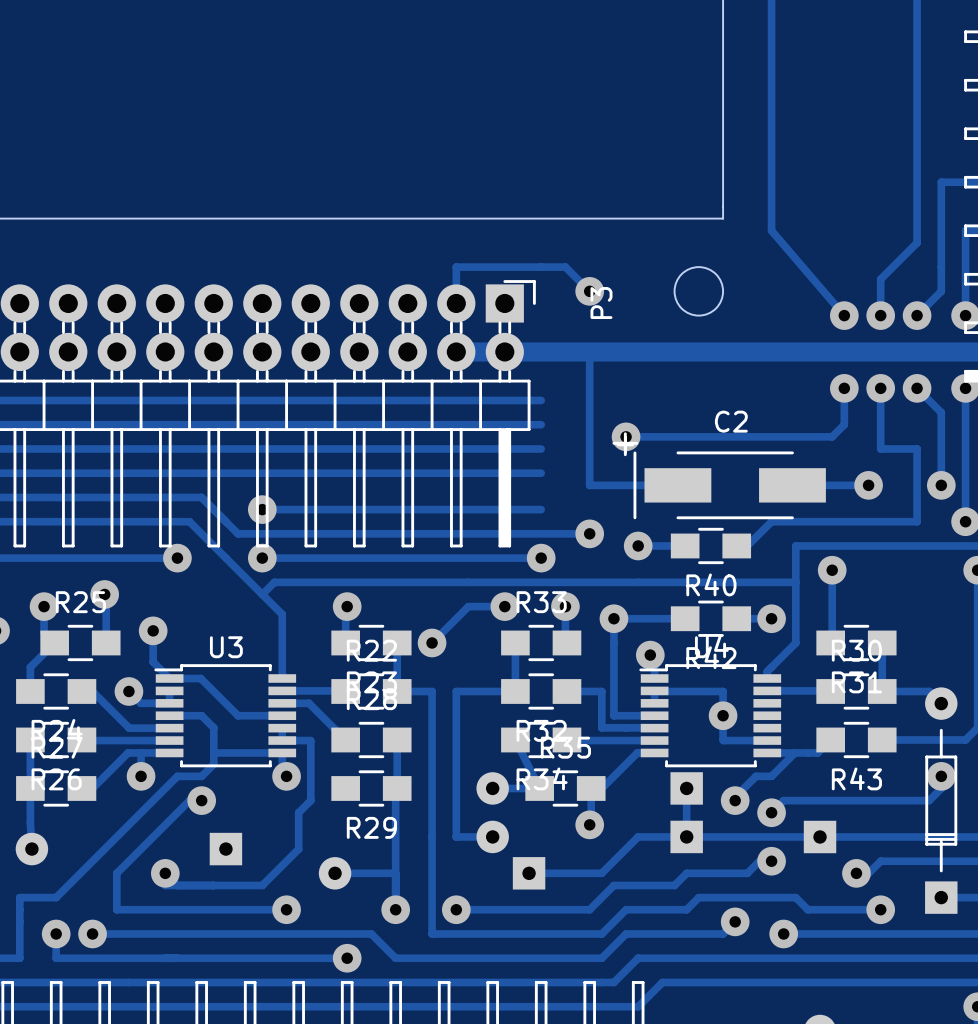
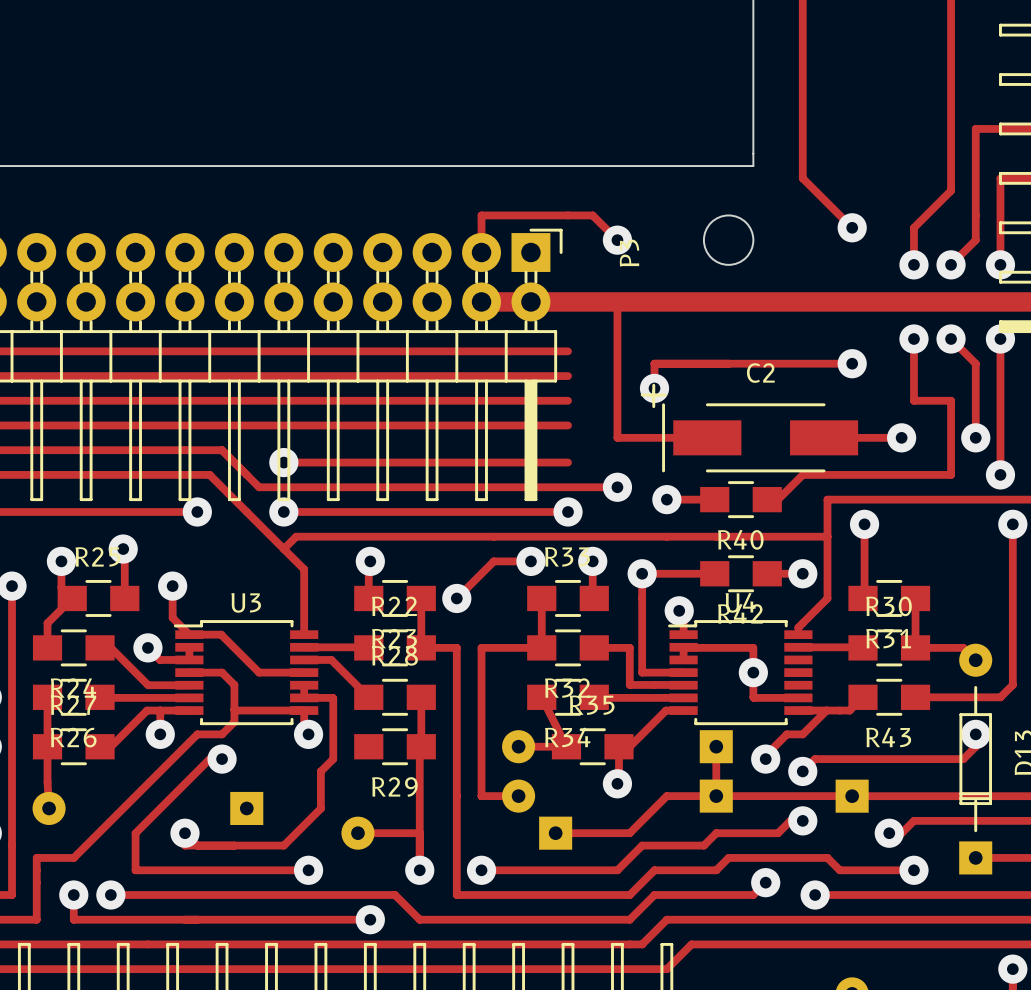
track: (771, 230) (844, 315) -> (802, 178) (852, 227)
via position: (844, 315) -> (852, 227)
track: (844, 388) (844, 424) (832, 436) (626, 436) -> (852, 363) (654, 363) (654, 388)
via position: (844, 388) -> (852, 363)

